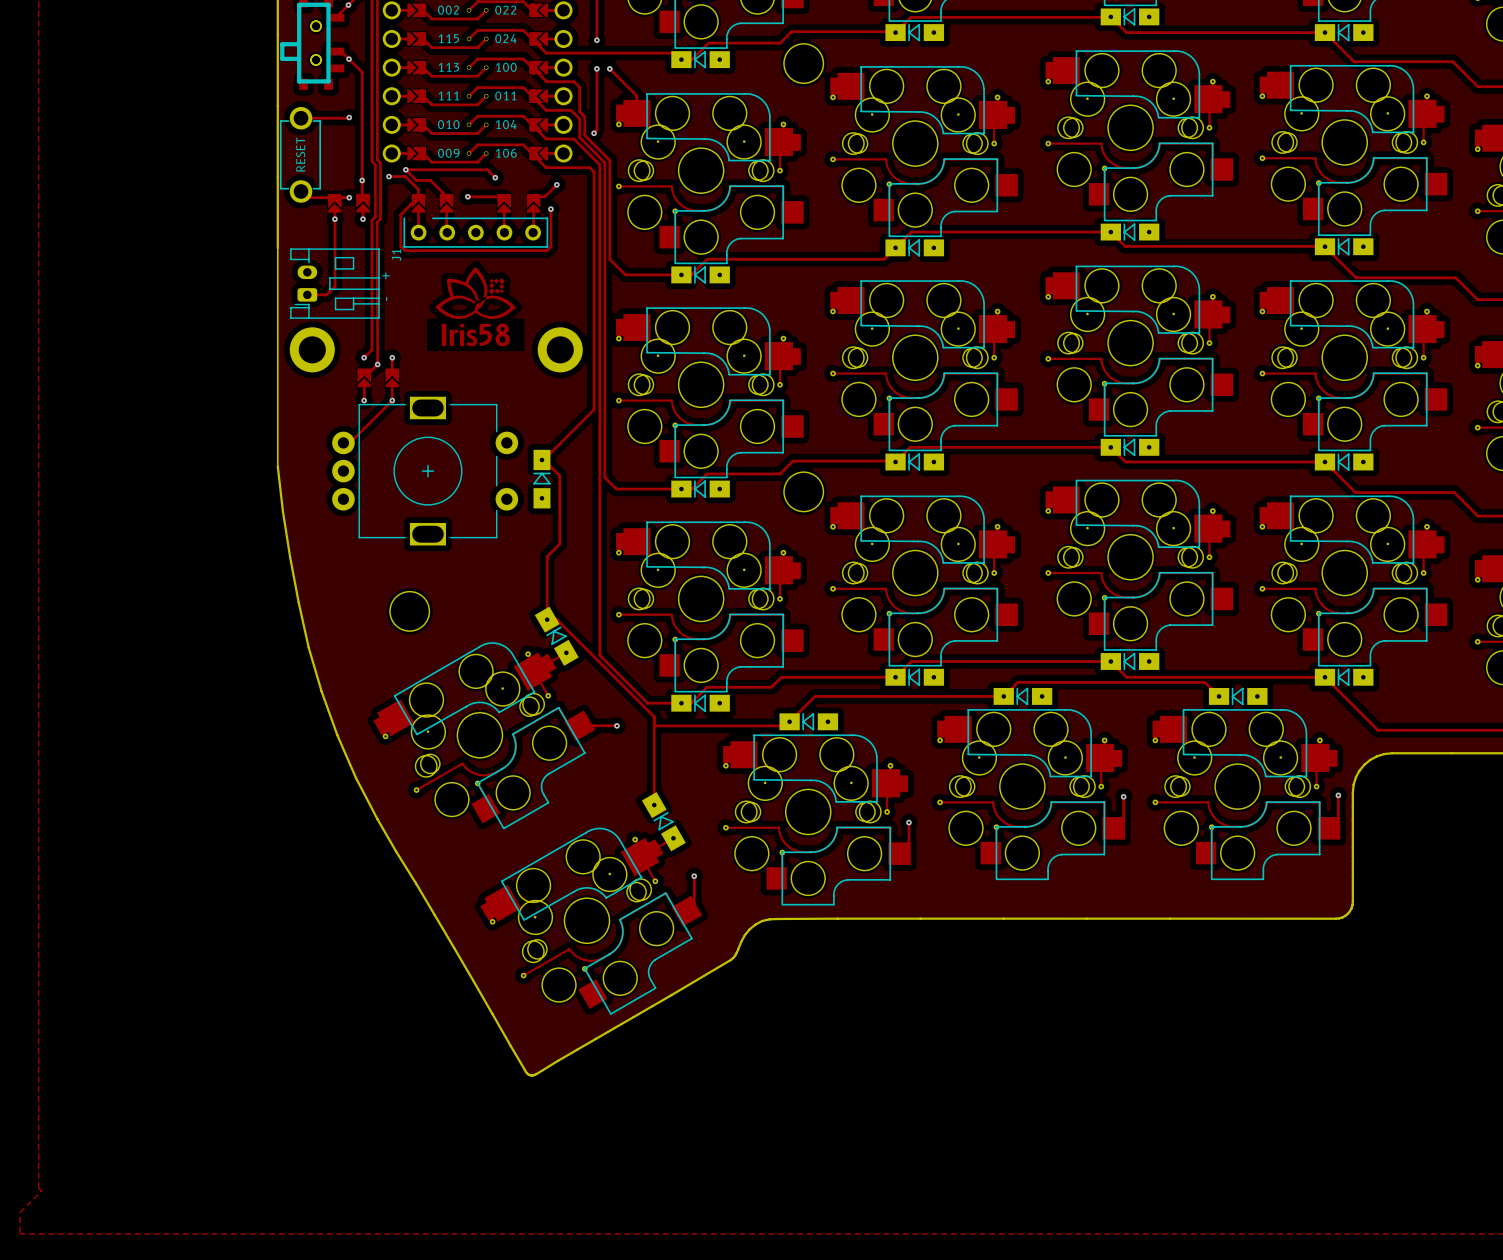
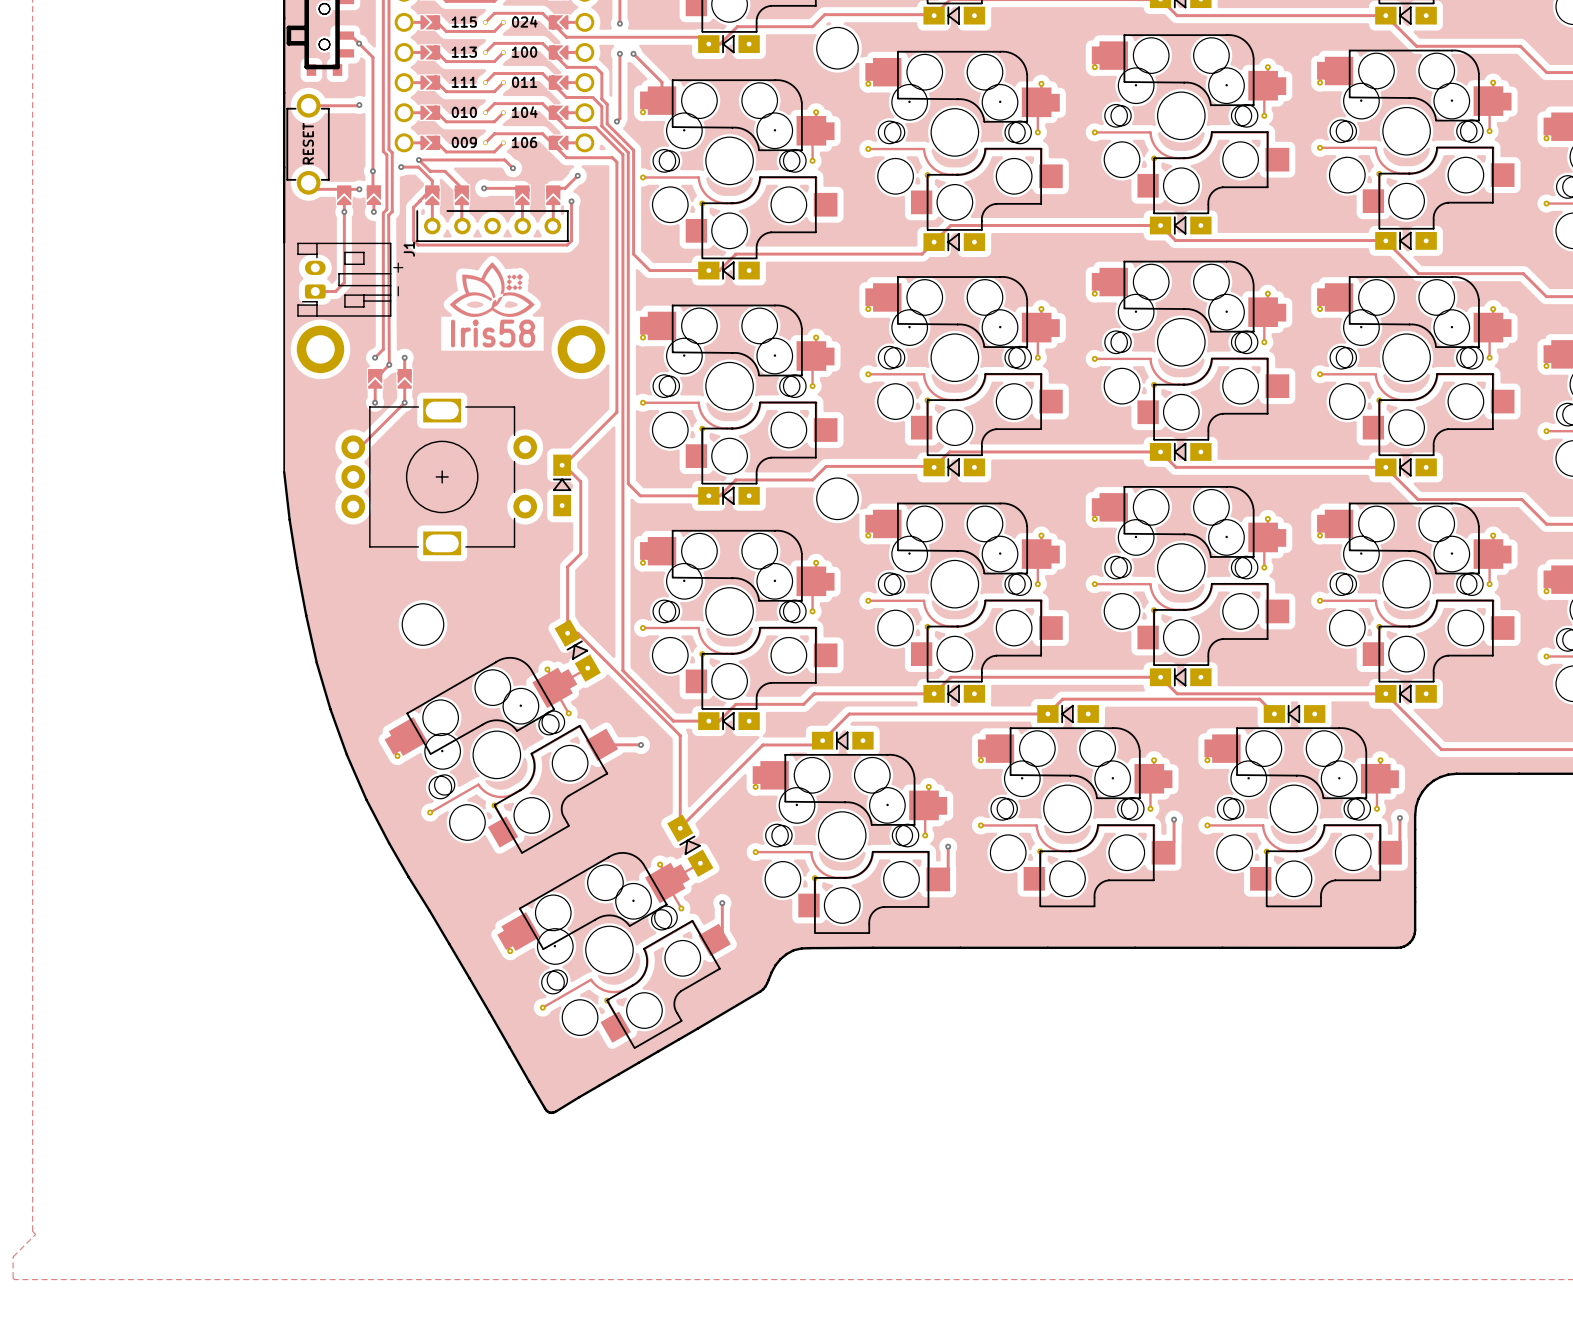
track: (654, 725) (732, 725) -> (680, 827) (762, 744)

